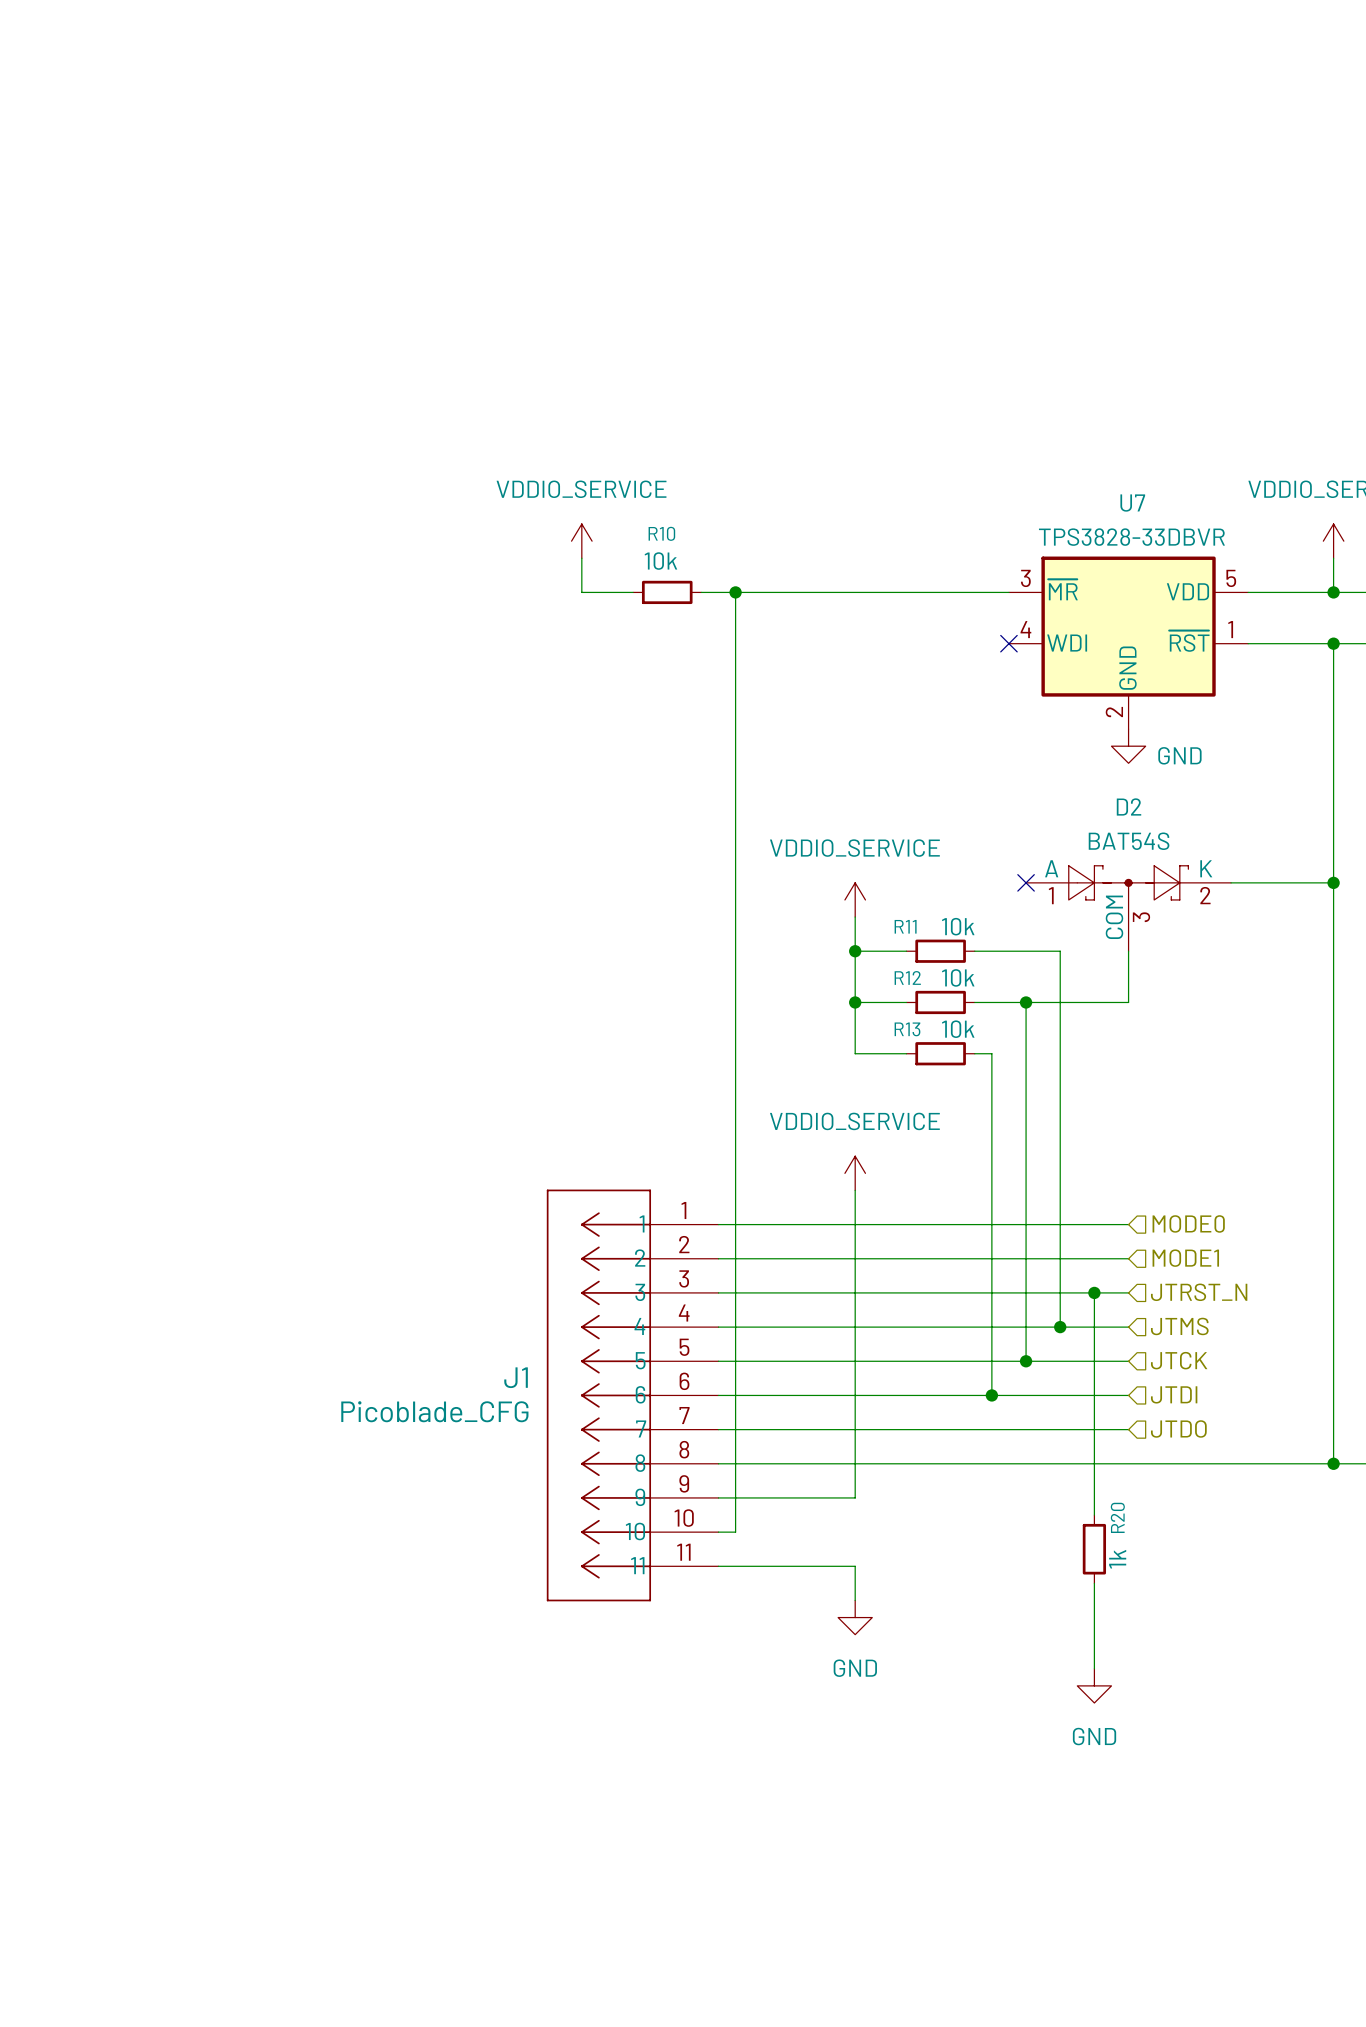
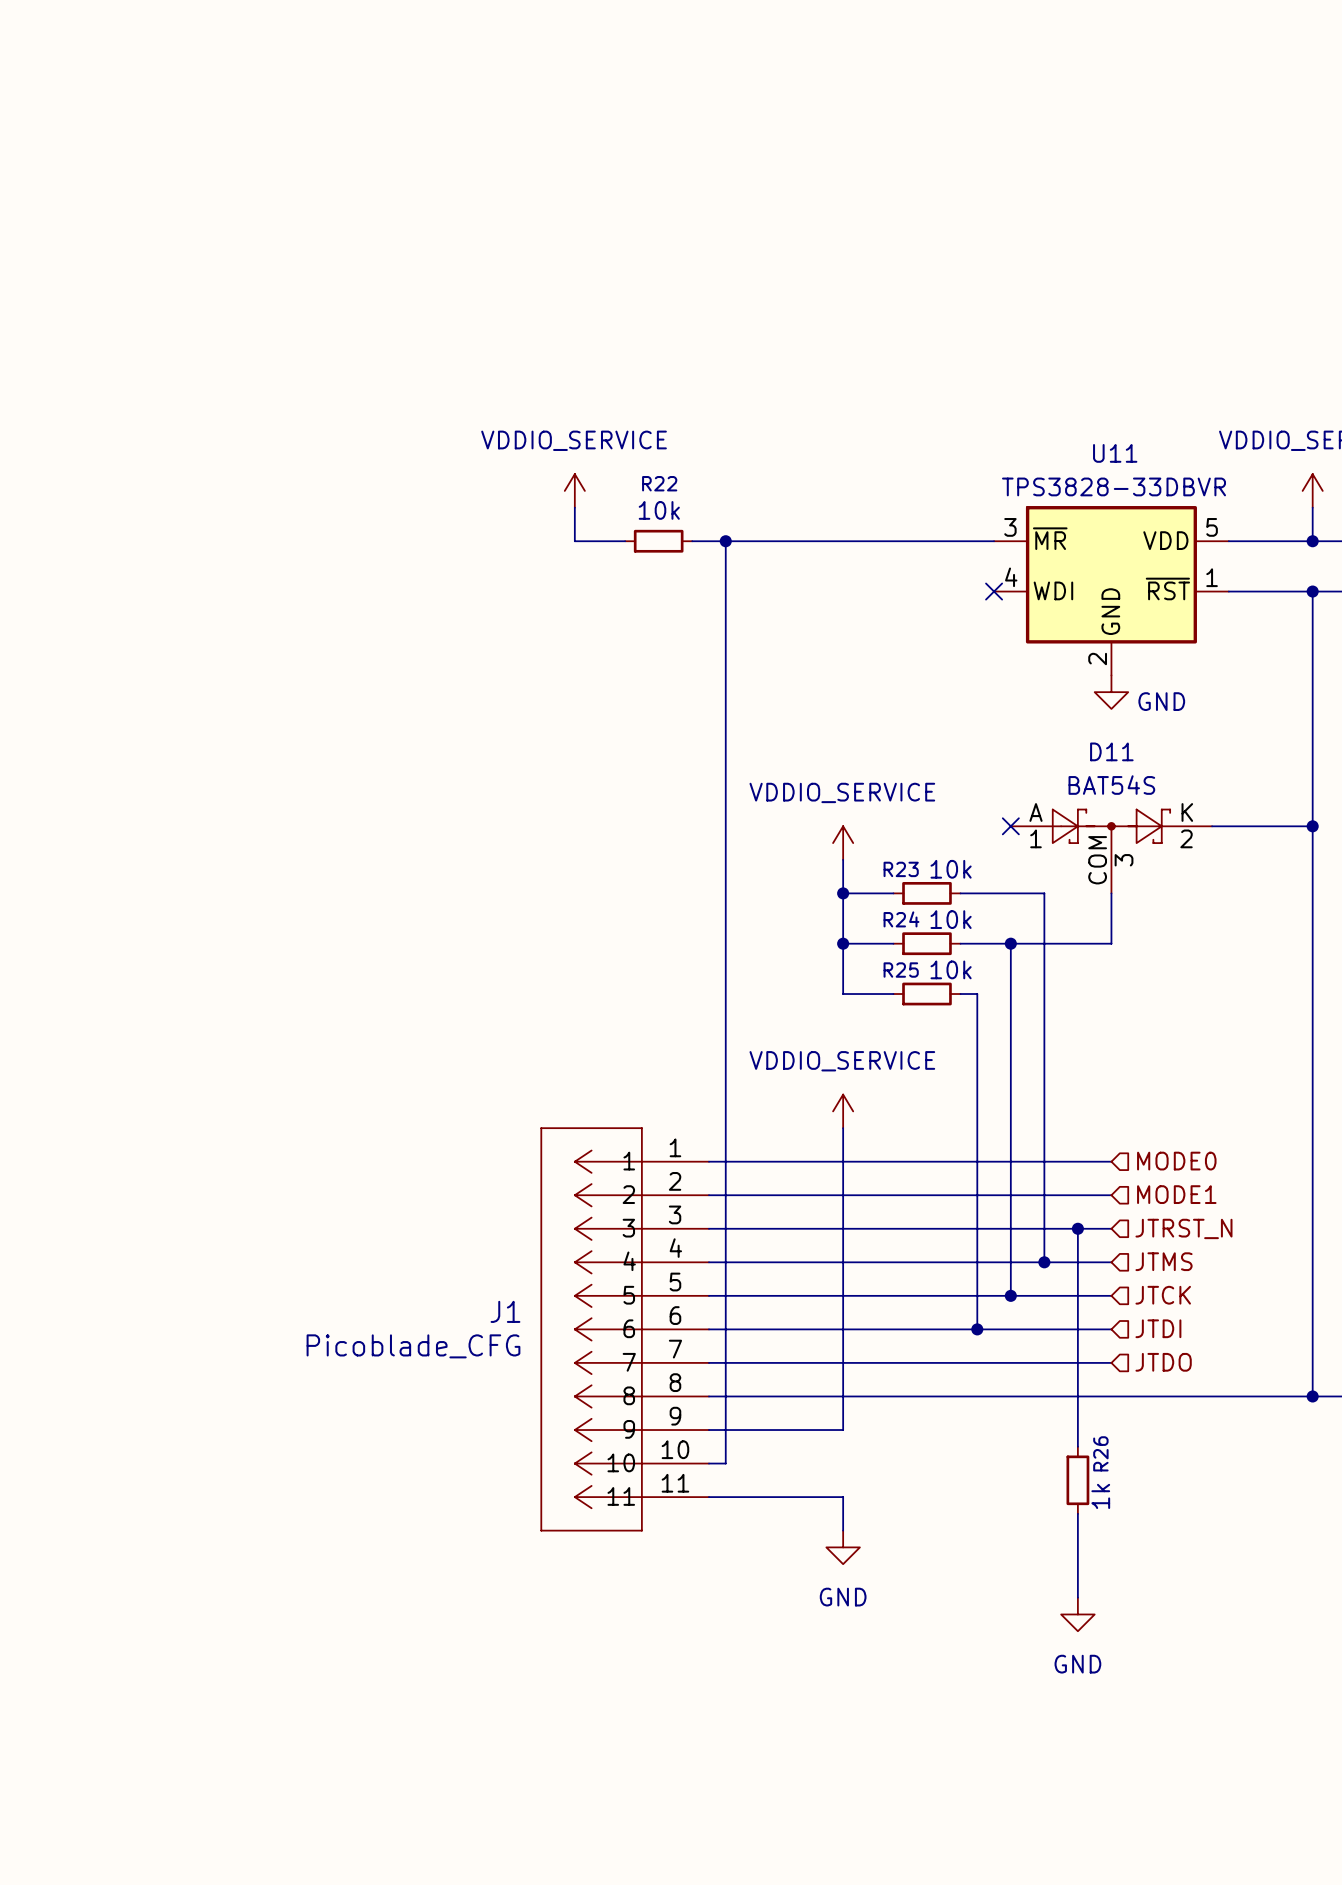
U7 name: U7 (1132, 503) -> U11 (1115, 453)
R10 name: R10 (661, 533) -> R22 (659, 483)
D2 name: D2 (1129, 806) -> D11 (1111, 751)
R11 name: R11 (905, 926) -> R23 (901, 869)
R12 name: R12 (907, 977) -> R24 (901, 919)
R13 name: R13 (907, 1029) -> R25 (901, 970)
R20 name: R20 (1117, 1517) -> R26 (1100, 1453)

